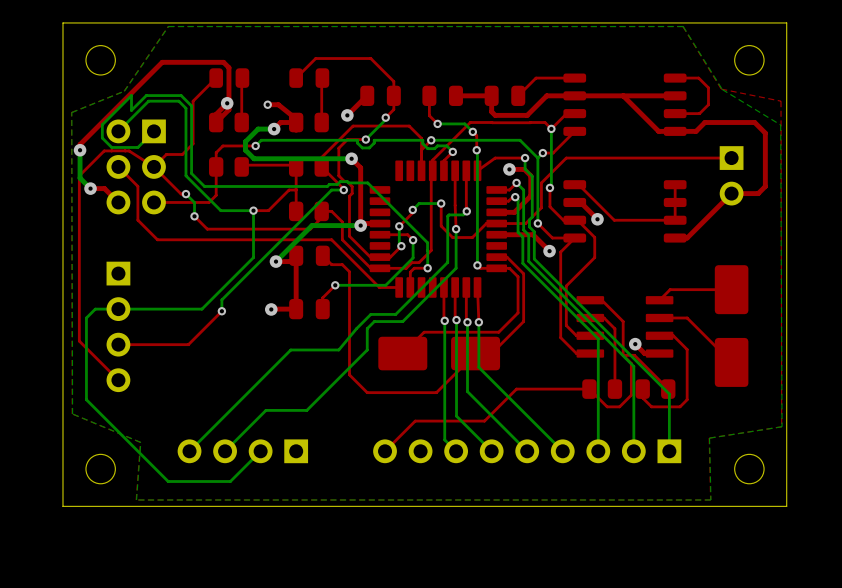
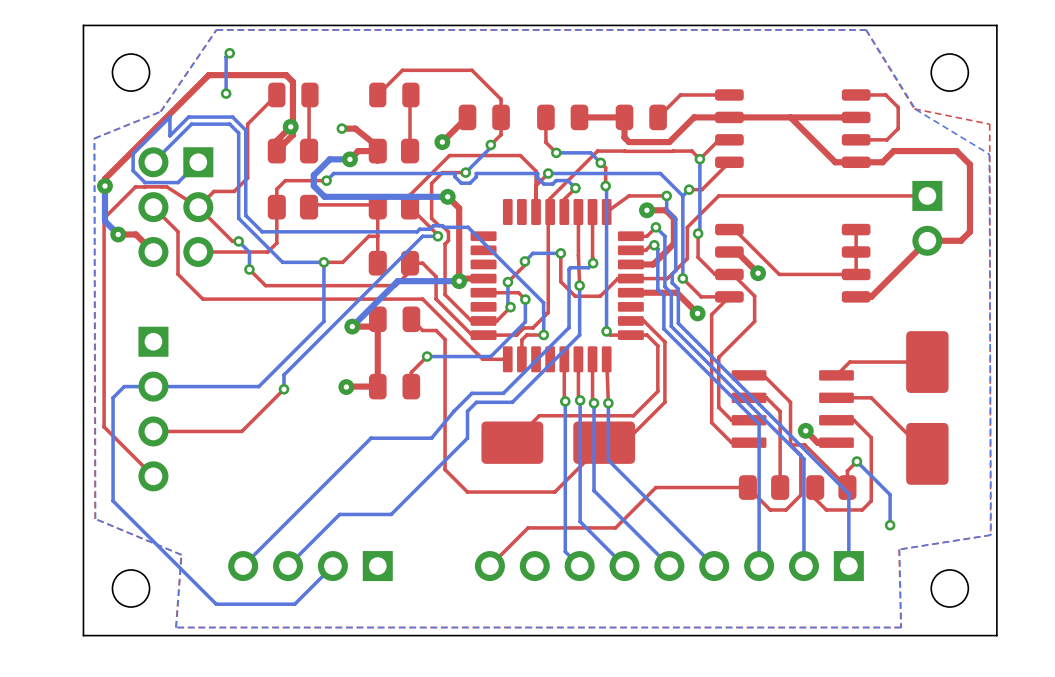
bottom track: none -> (229, 53) (226, 56) (226, 93)
via: none -> (229, 53)
via: none -> (226, 93)
top track: none -> (856, 461) (847, 471) (847, 487)
bottom track: none -> (856, 461) (890, 494) (890, 525)
via: none -> (856, 461)
via: none -> (890, 525)

